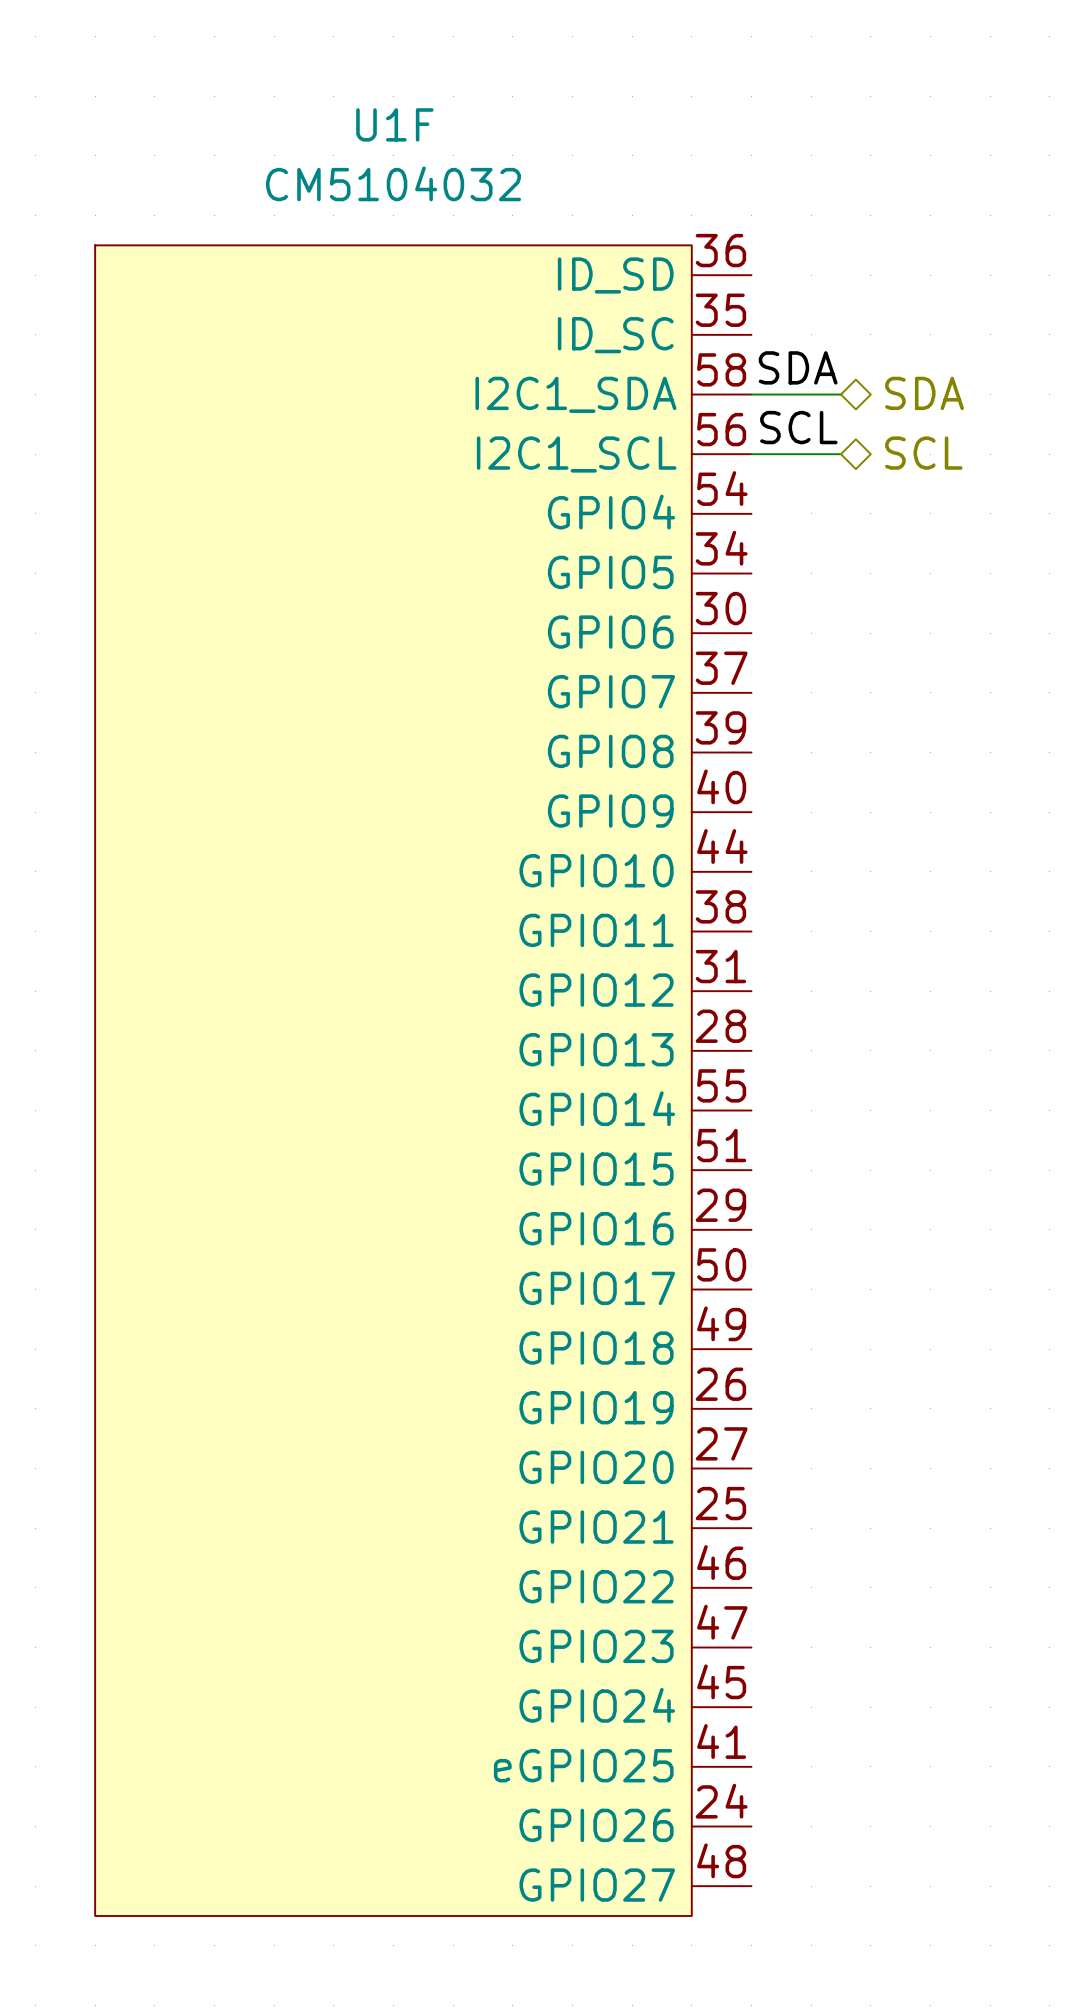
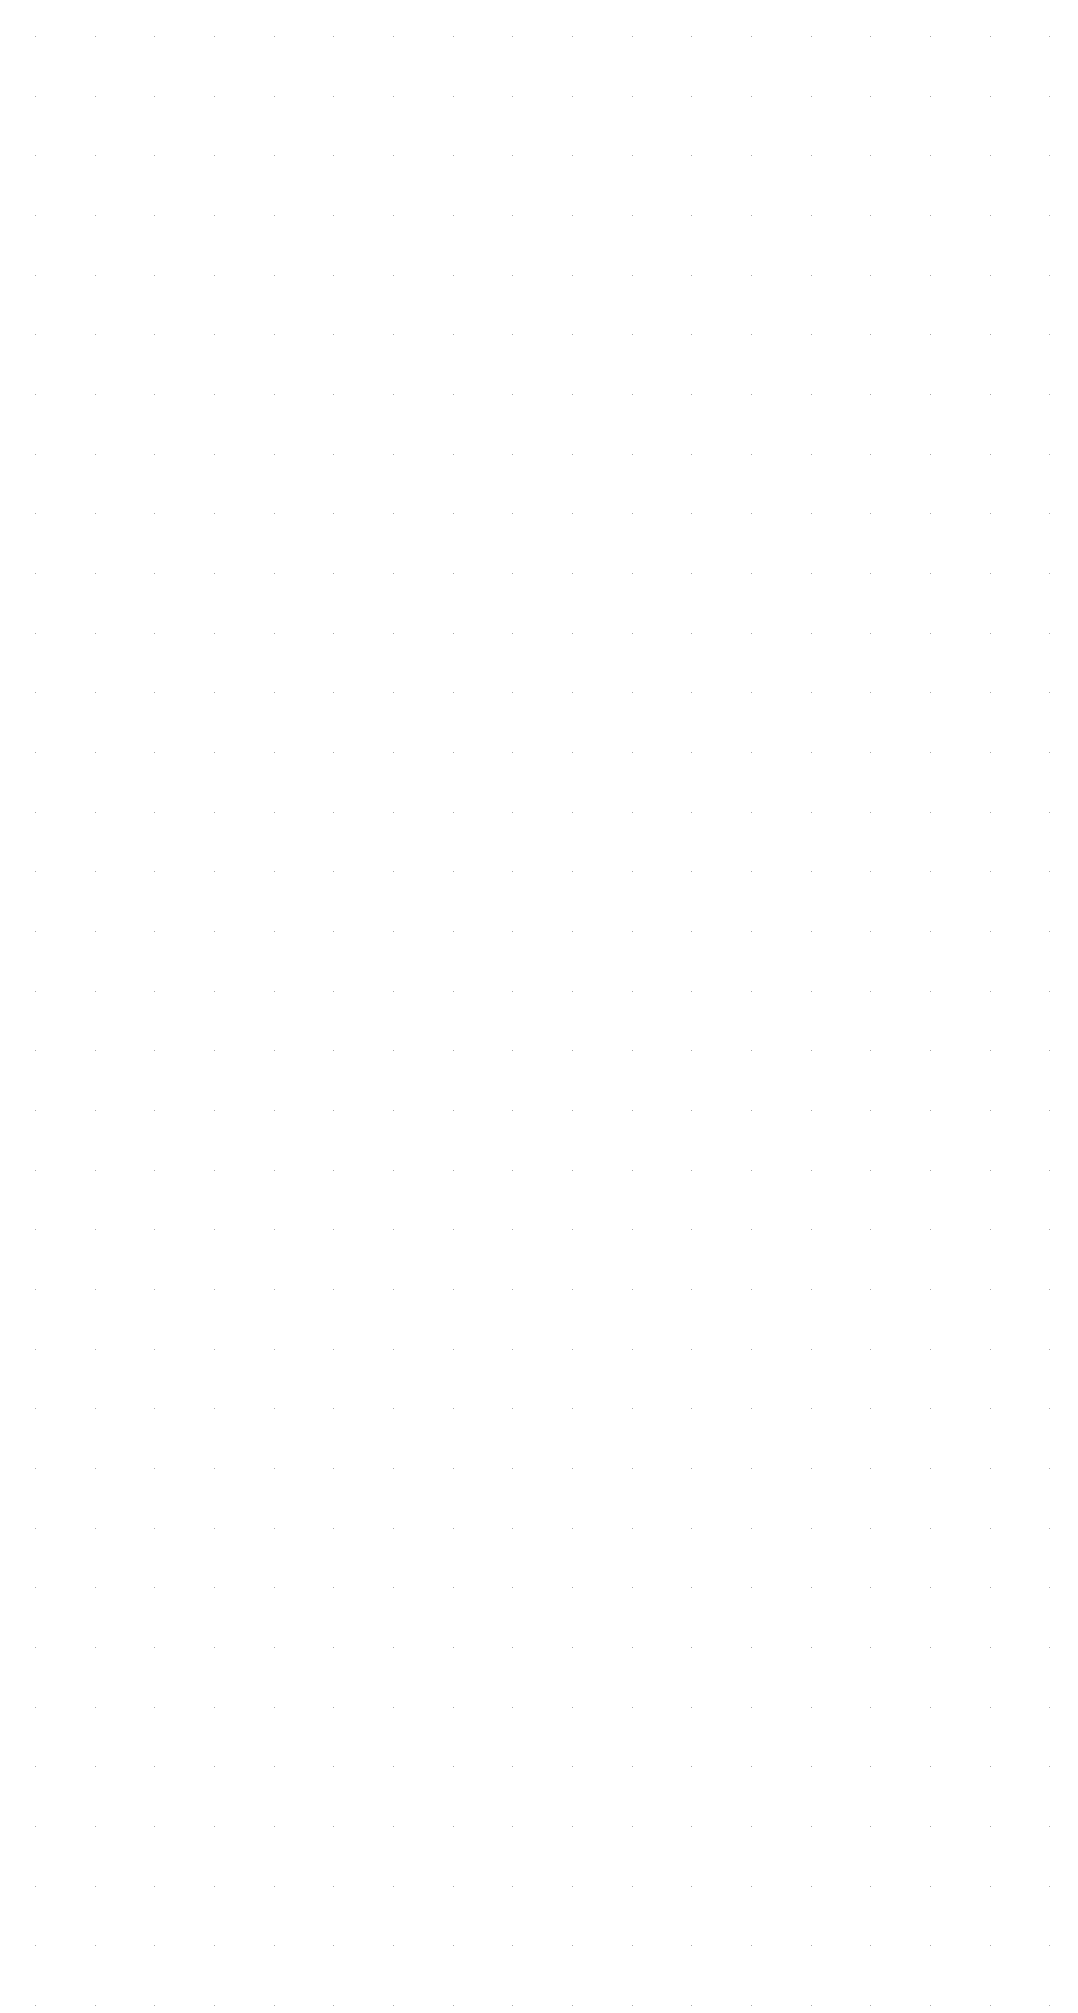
label: SDA (798, 367) -> none
hierarchical label: SDA (924, 393) -> none
wire: (751, 394) (840, 394) -> none
label: SCL (798, 427) -> none
hierarchical label: SCL (923, 453) -> none
wire: (751, 454) (840, 454) -> none
U1F: CM5104032 (423, 1080) -> none

